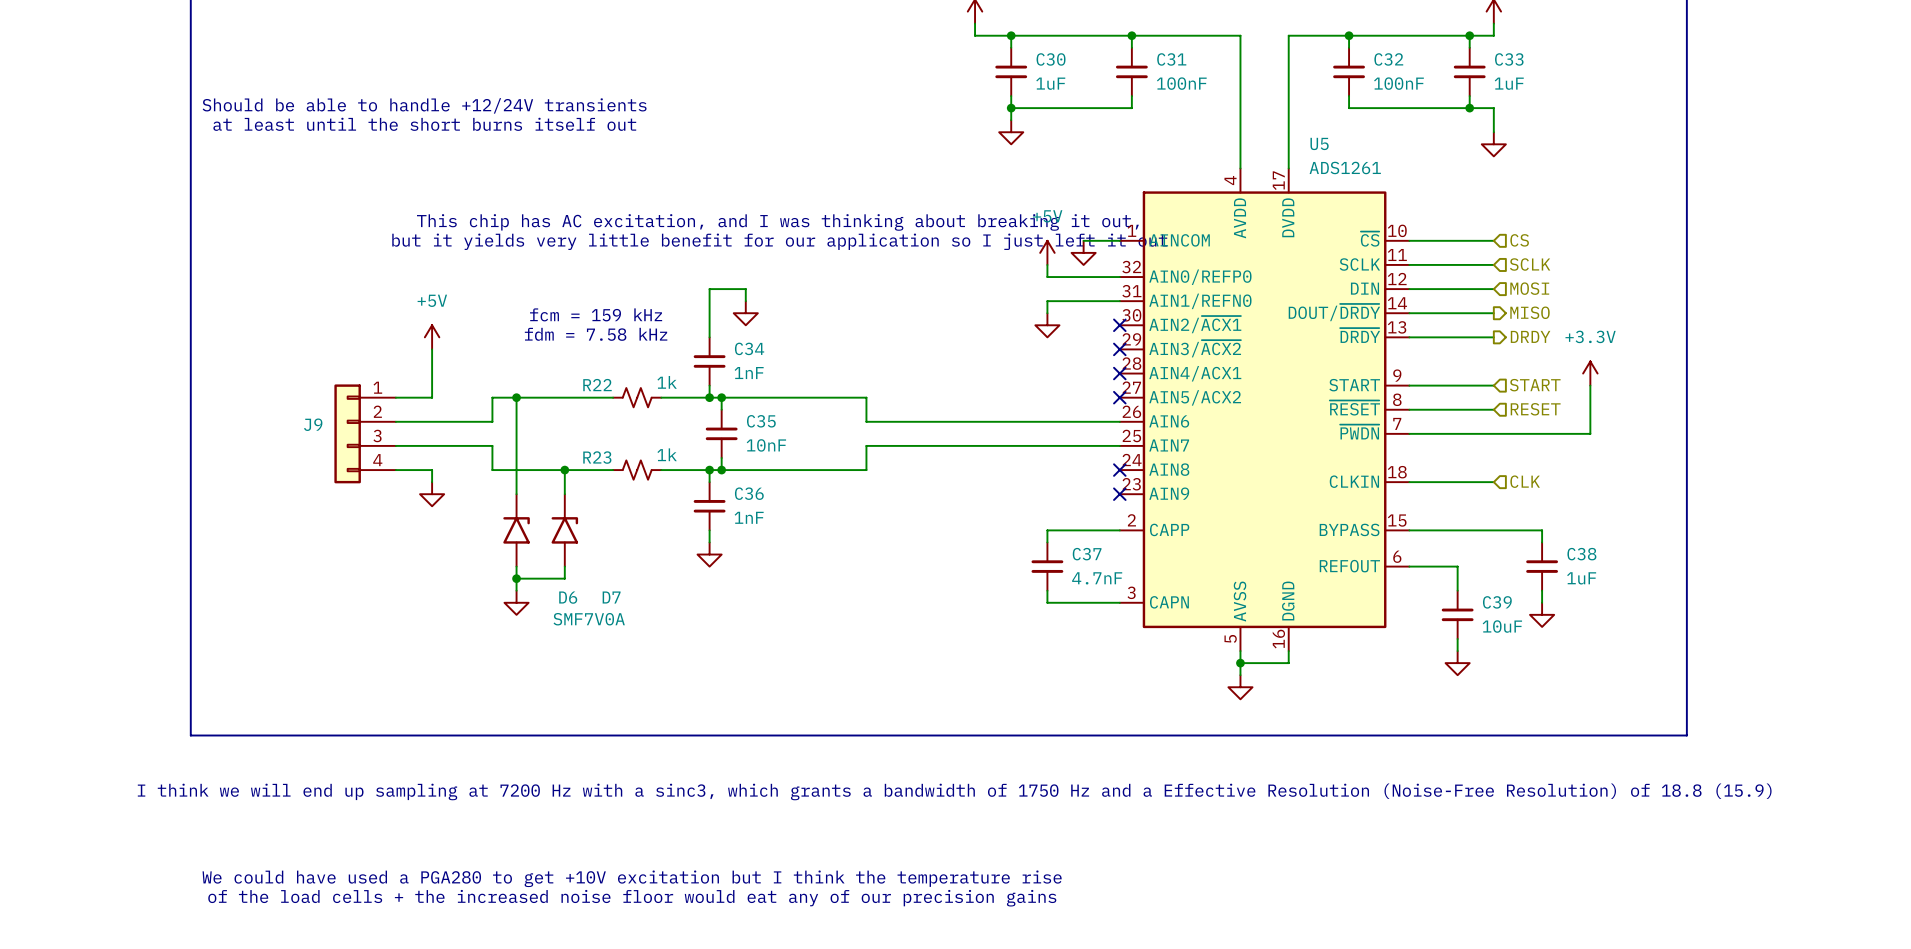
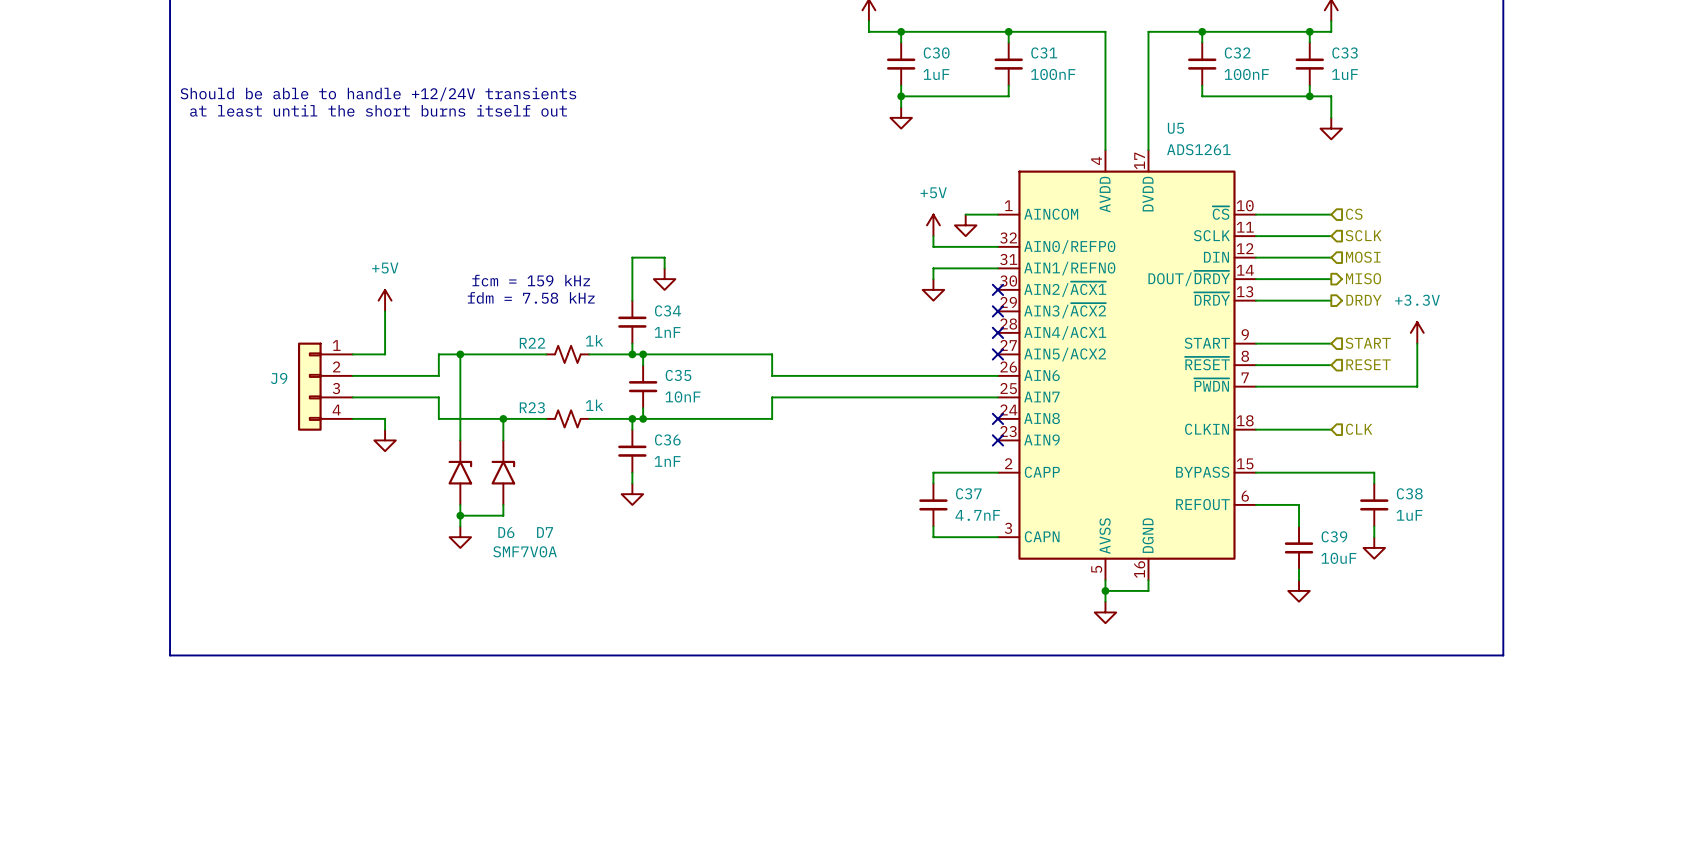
text: This chip has AC excitation, and I was thinking about breaking it out, (777, 222) -> none
text: but it yields very little benefit for our application so I just left it out (779, 241) -> none
text: I think we will end up sampling at 7200 Hz with a sinc3, which grants a bandwidth of 1750 Hz and a Effective Resolution (Noise-Free Resolution) of 18.8 (15.9) (954, 791) -> none
text: We could have used a PGA280 to get +10V excitation but I think the temperature rise (632, 878) -> none
text: of the load cells + the increased noise floor would eat any of our precision gains (632, 898) -> none

